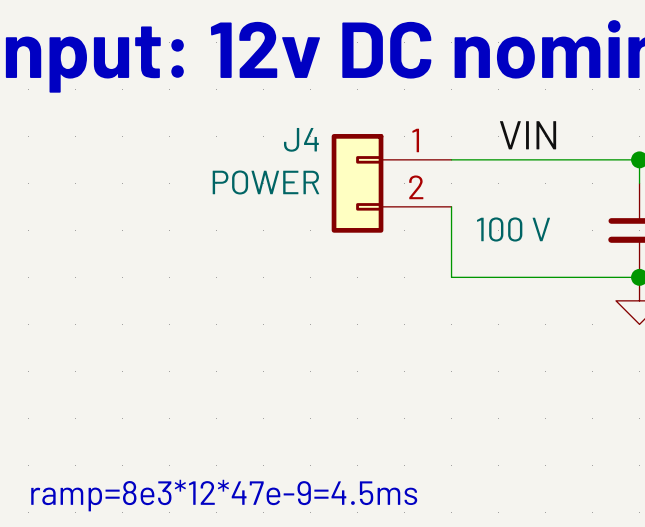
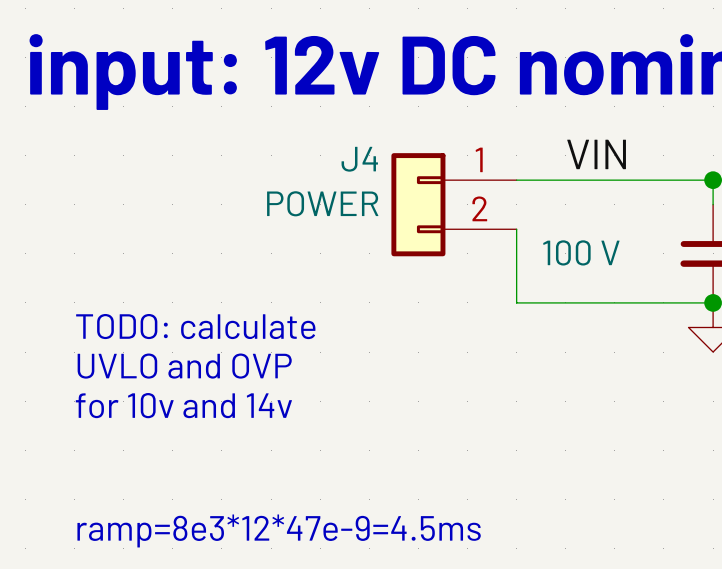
text: none -> TODO: calculate (195, 326)
text: none -> UVLO and OVP (184, 366)
text: none -> for 10v and 14v (183, 405)

